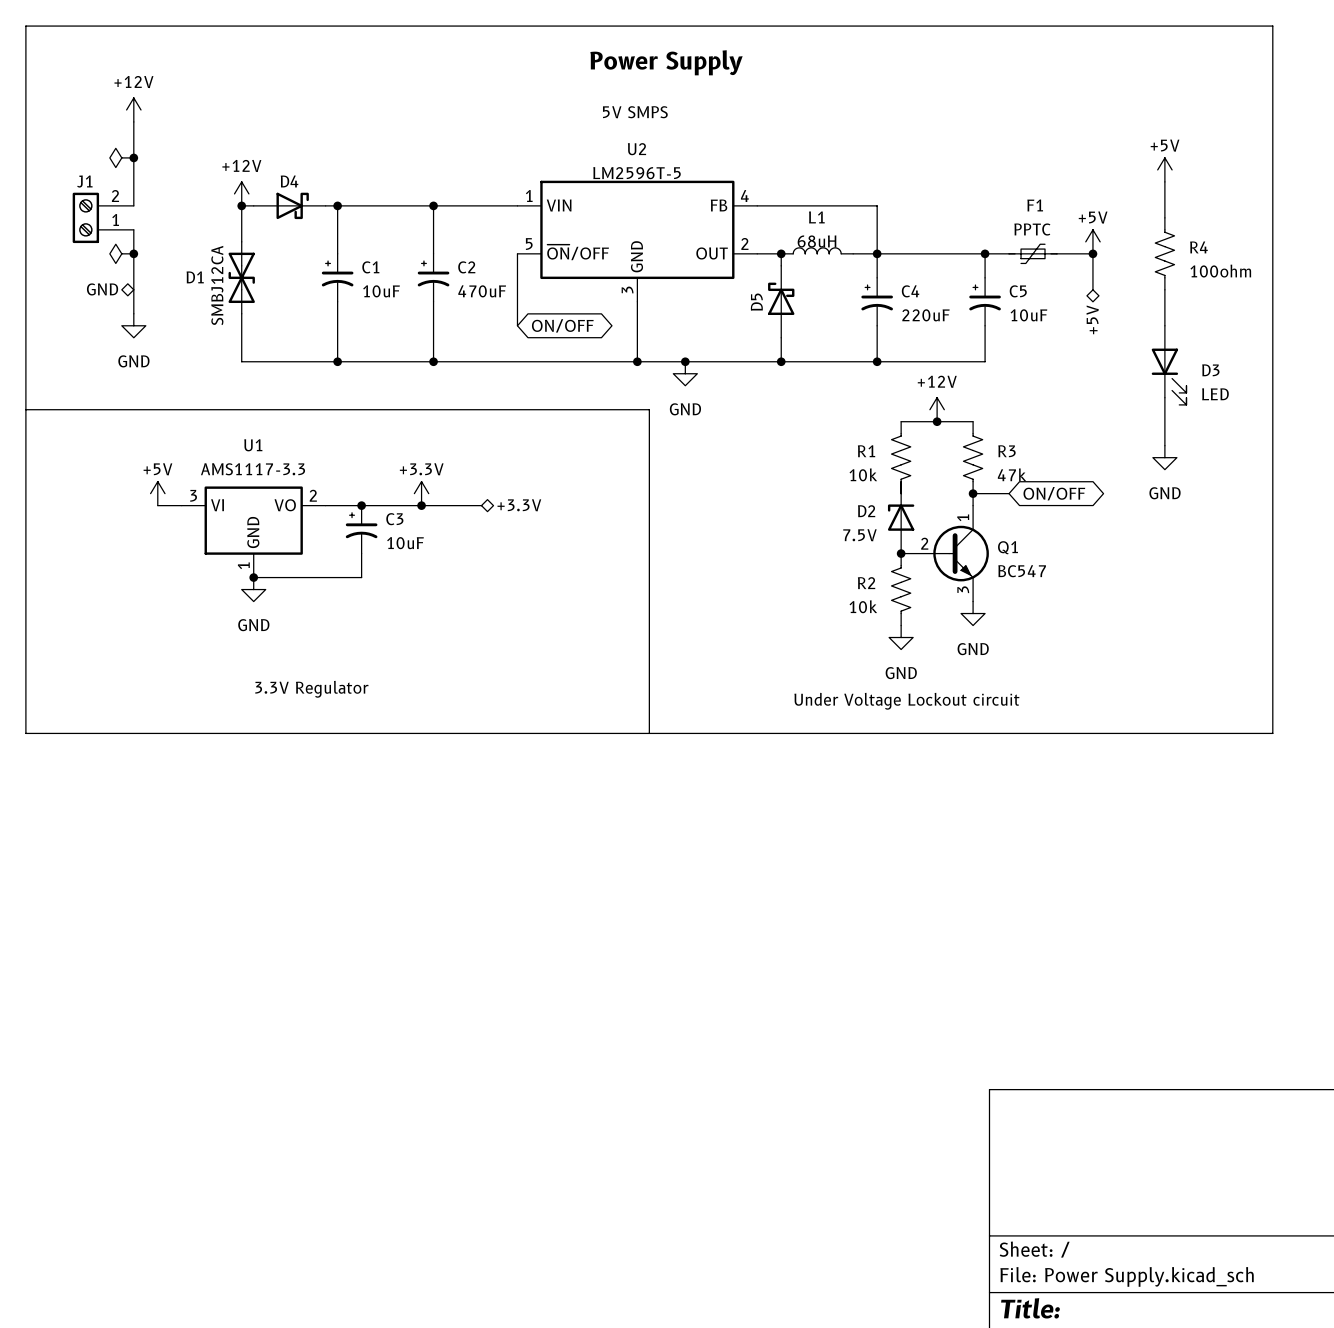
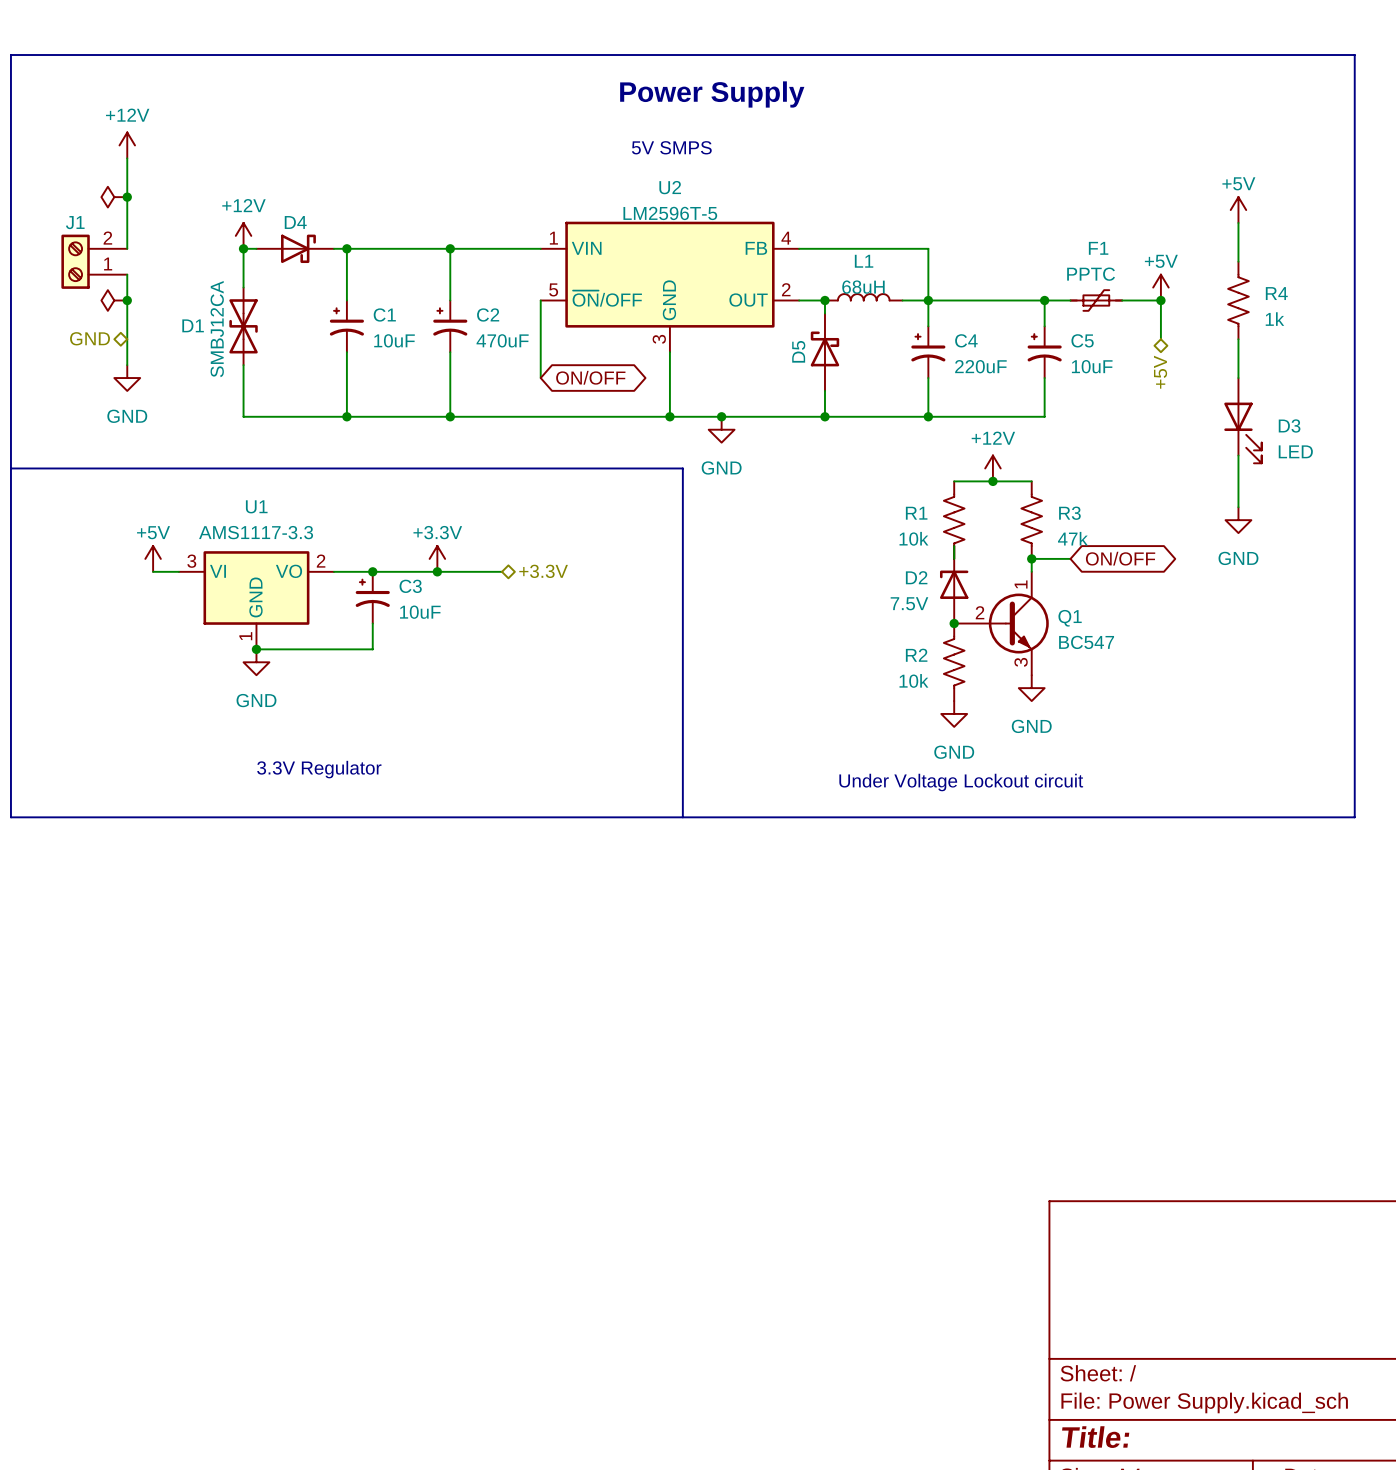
R4 value: 100ohm (1220, 271) -> 1k (1274, 319)

